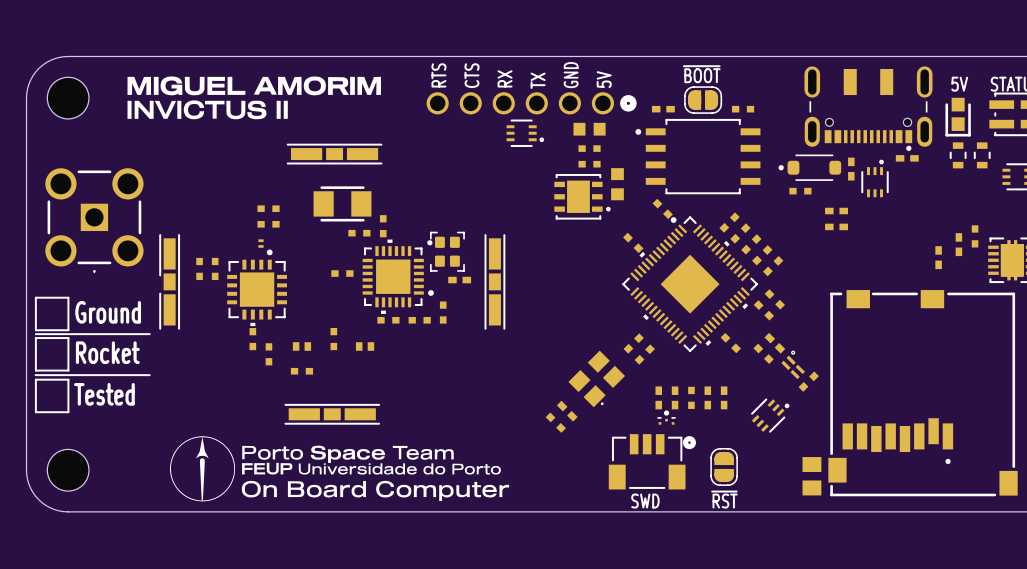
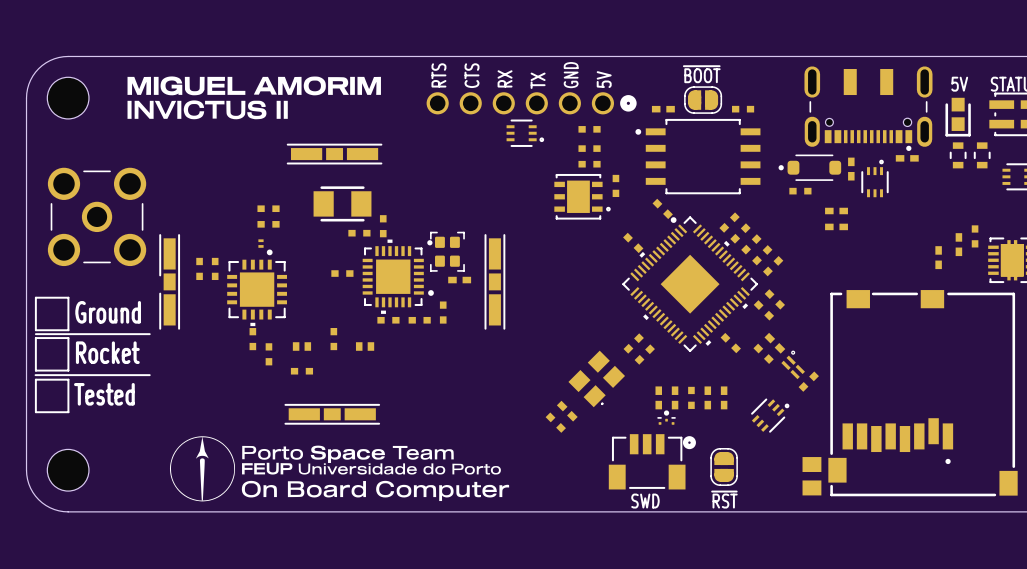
part footprint: [573, 122, 606, 136] -> [578, 126, 601, 133]
part footprint: [45, 168, 144, 273] -> [47, 167, 147, 267]
part footprint: [611, 168, 624, 201] -> [612, 174, 620, 198]

